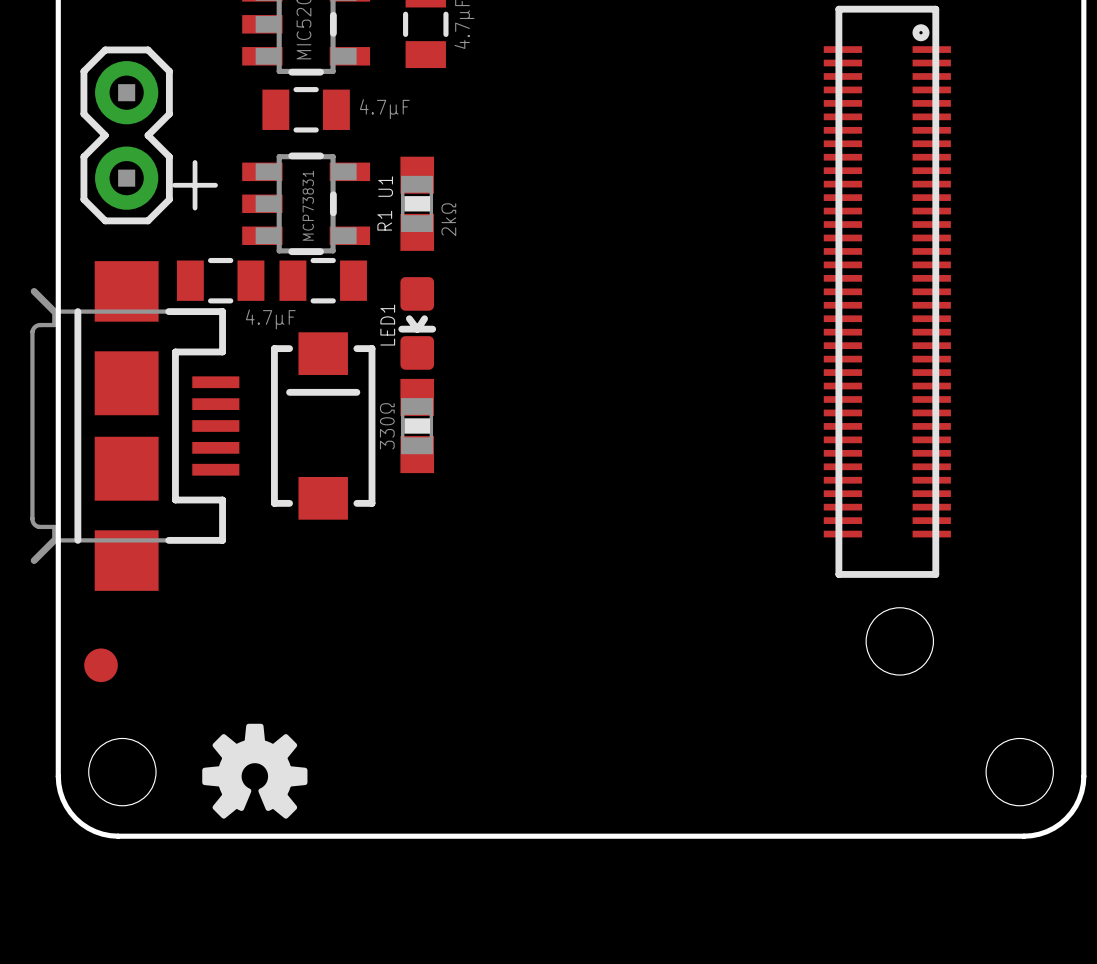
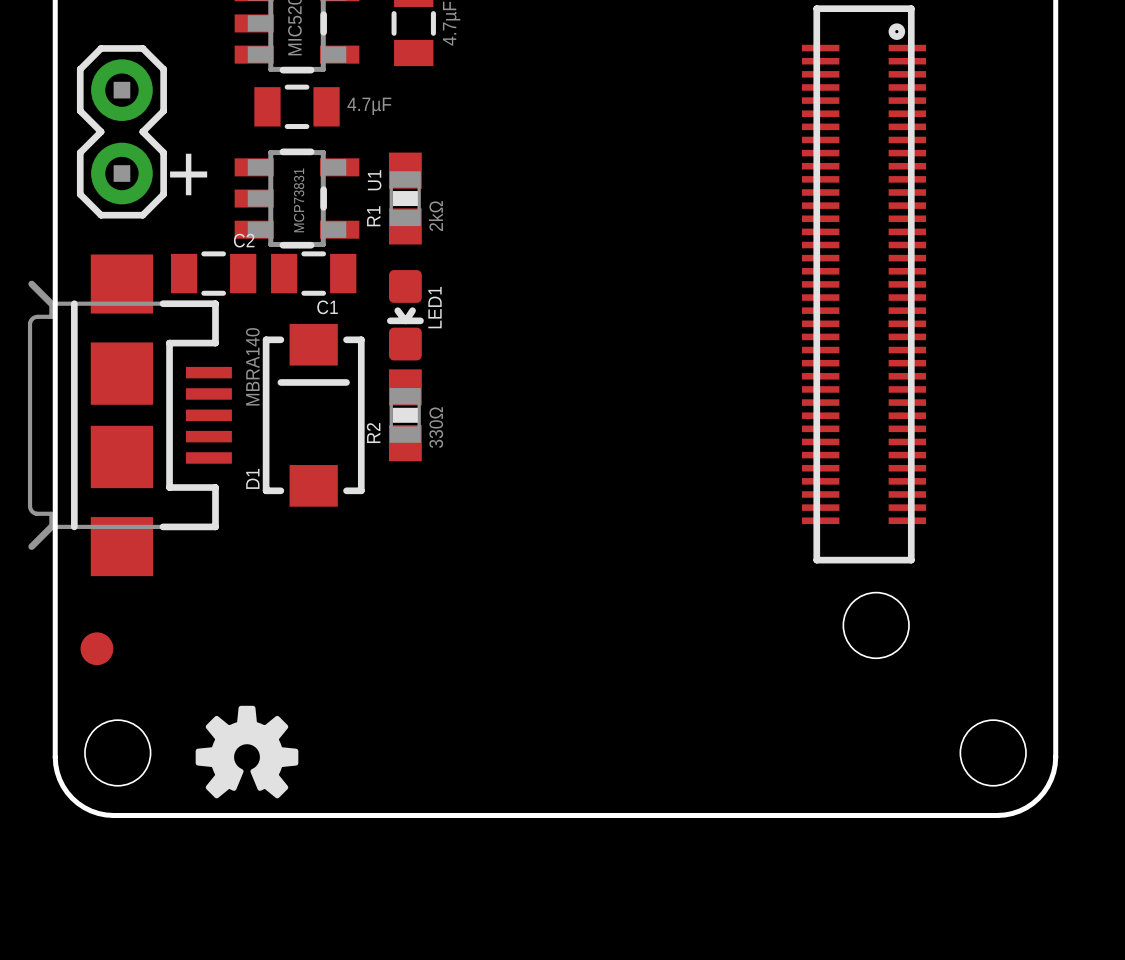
C2 name: none -> C2 (244, 240)
C1 name: none -> C1 (327, 307)
C2 value: 4.7µF (270, 319) -> none
LED1 name position: LED1 (387, 325) -> LED1 (435, 307)
D1 value: none -> MBRA140 (252, 366)
R2 value position: 330Ω (387, 426) -> 330Ω (436, 427)
R2 name: none -> R2 (373, 433)
D1 name: none -> D1 (252, 478)

